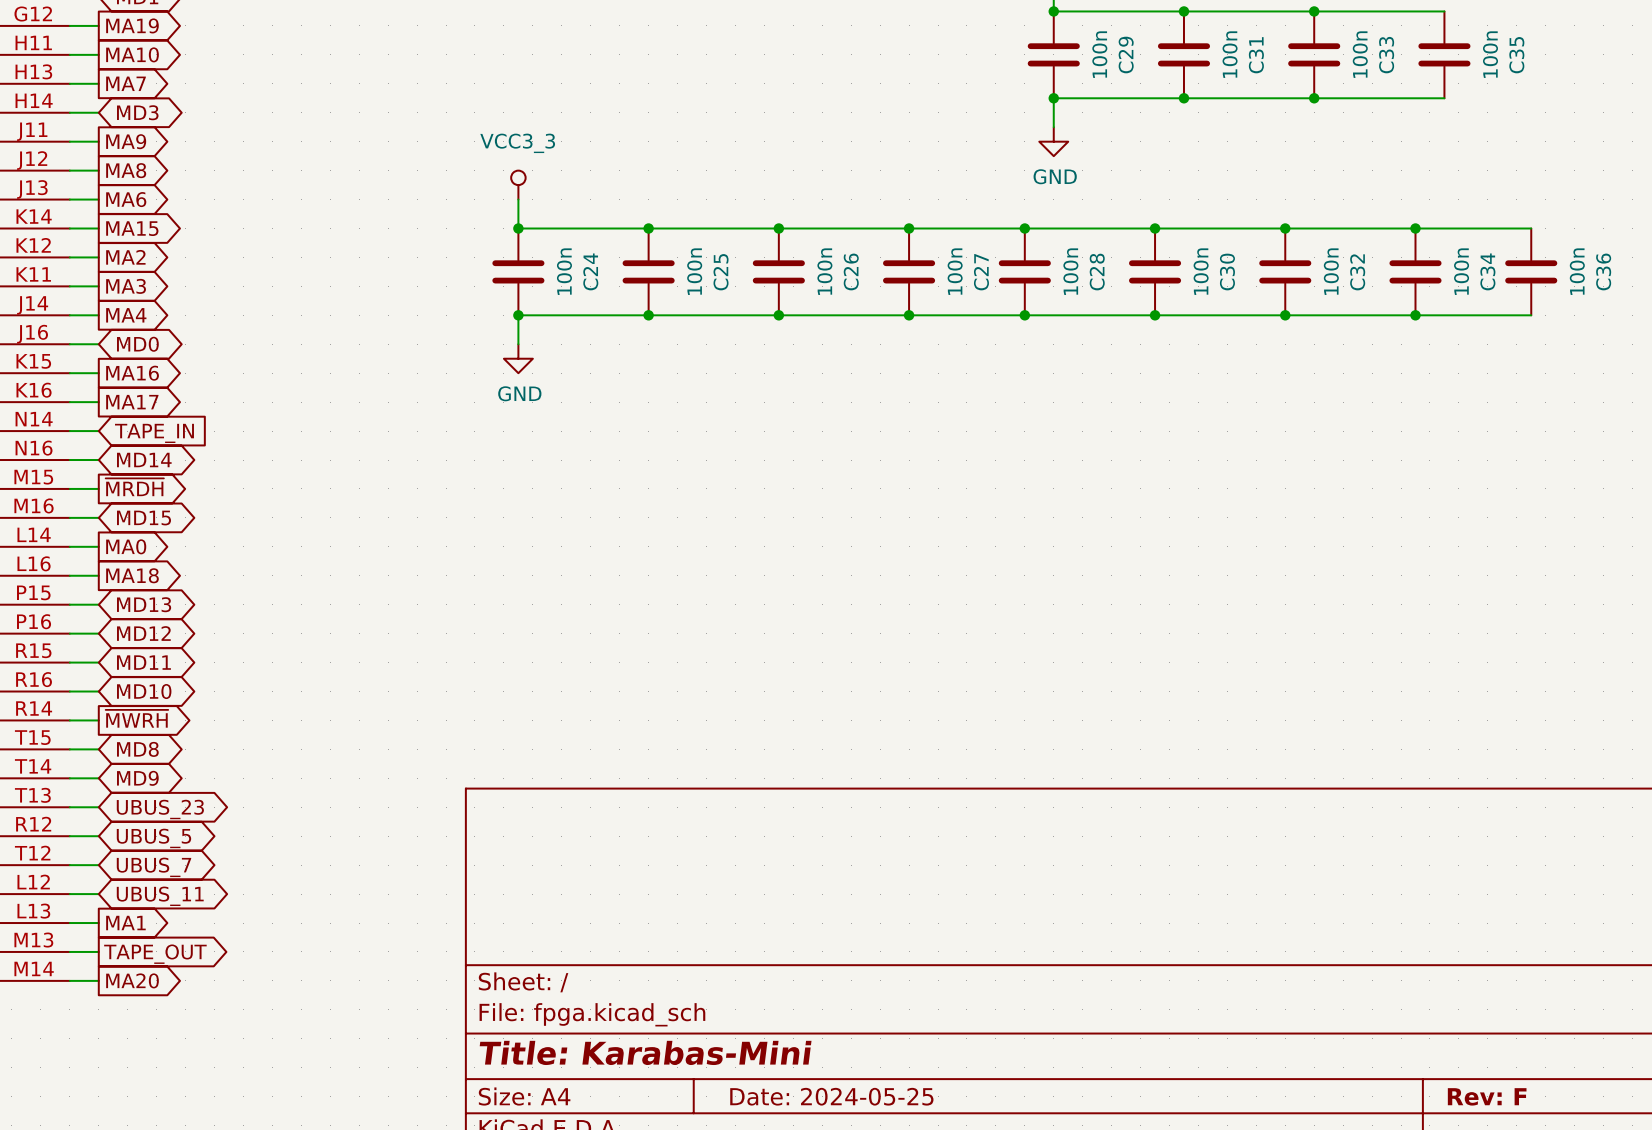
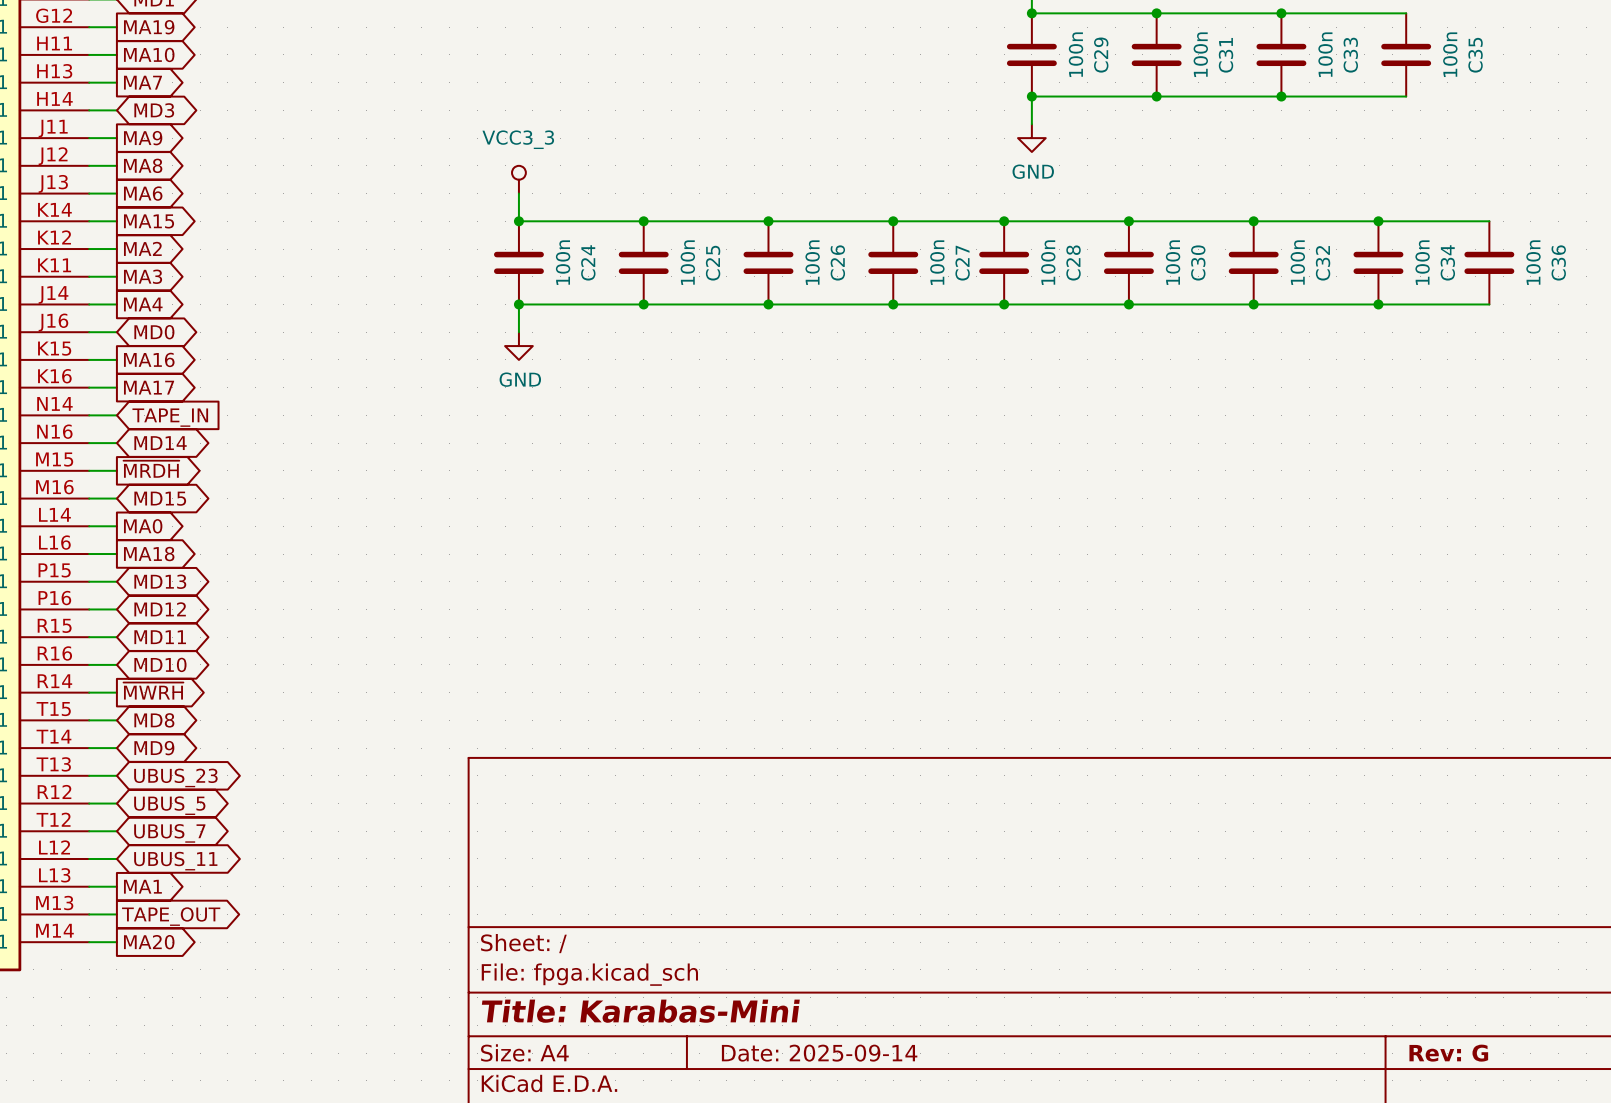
title block: Date: 2024-05-25 (831, 1096) -> Date: 2025-09-14 (819, 1053)
title block: Rev: F (1487, 1096) -> Rev: G (1448, 1053)

